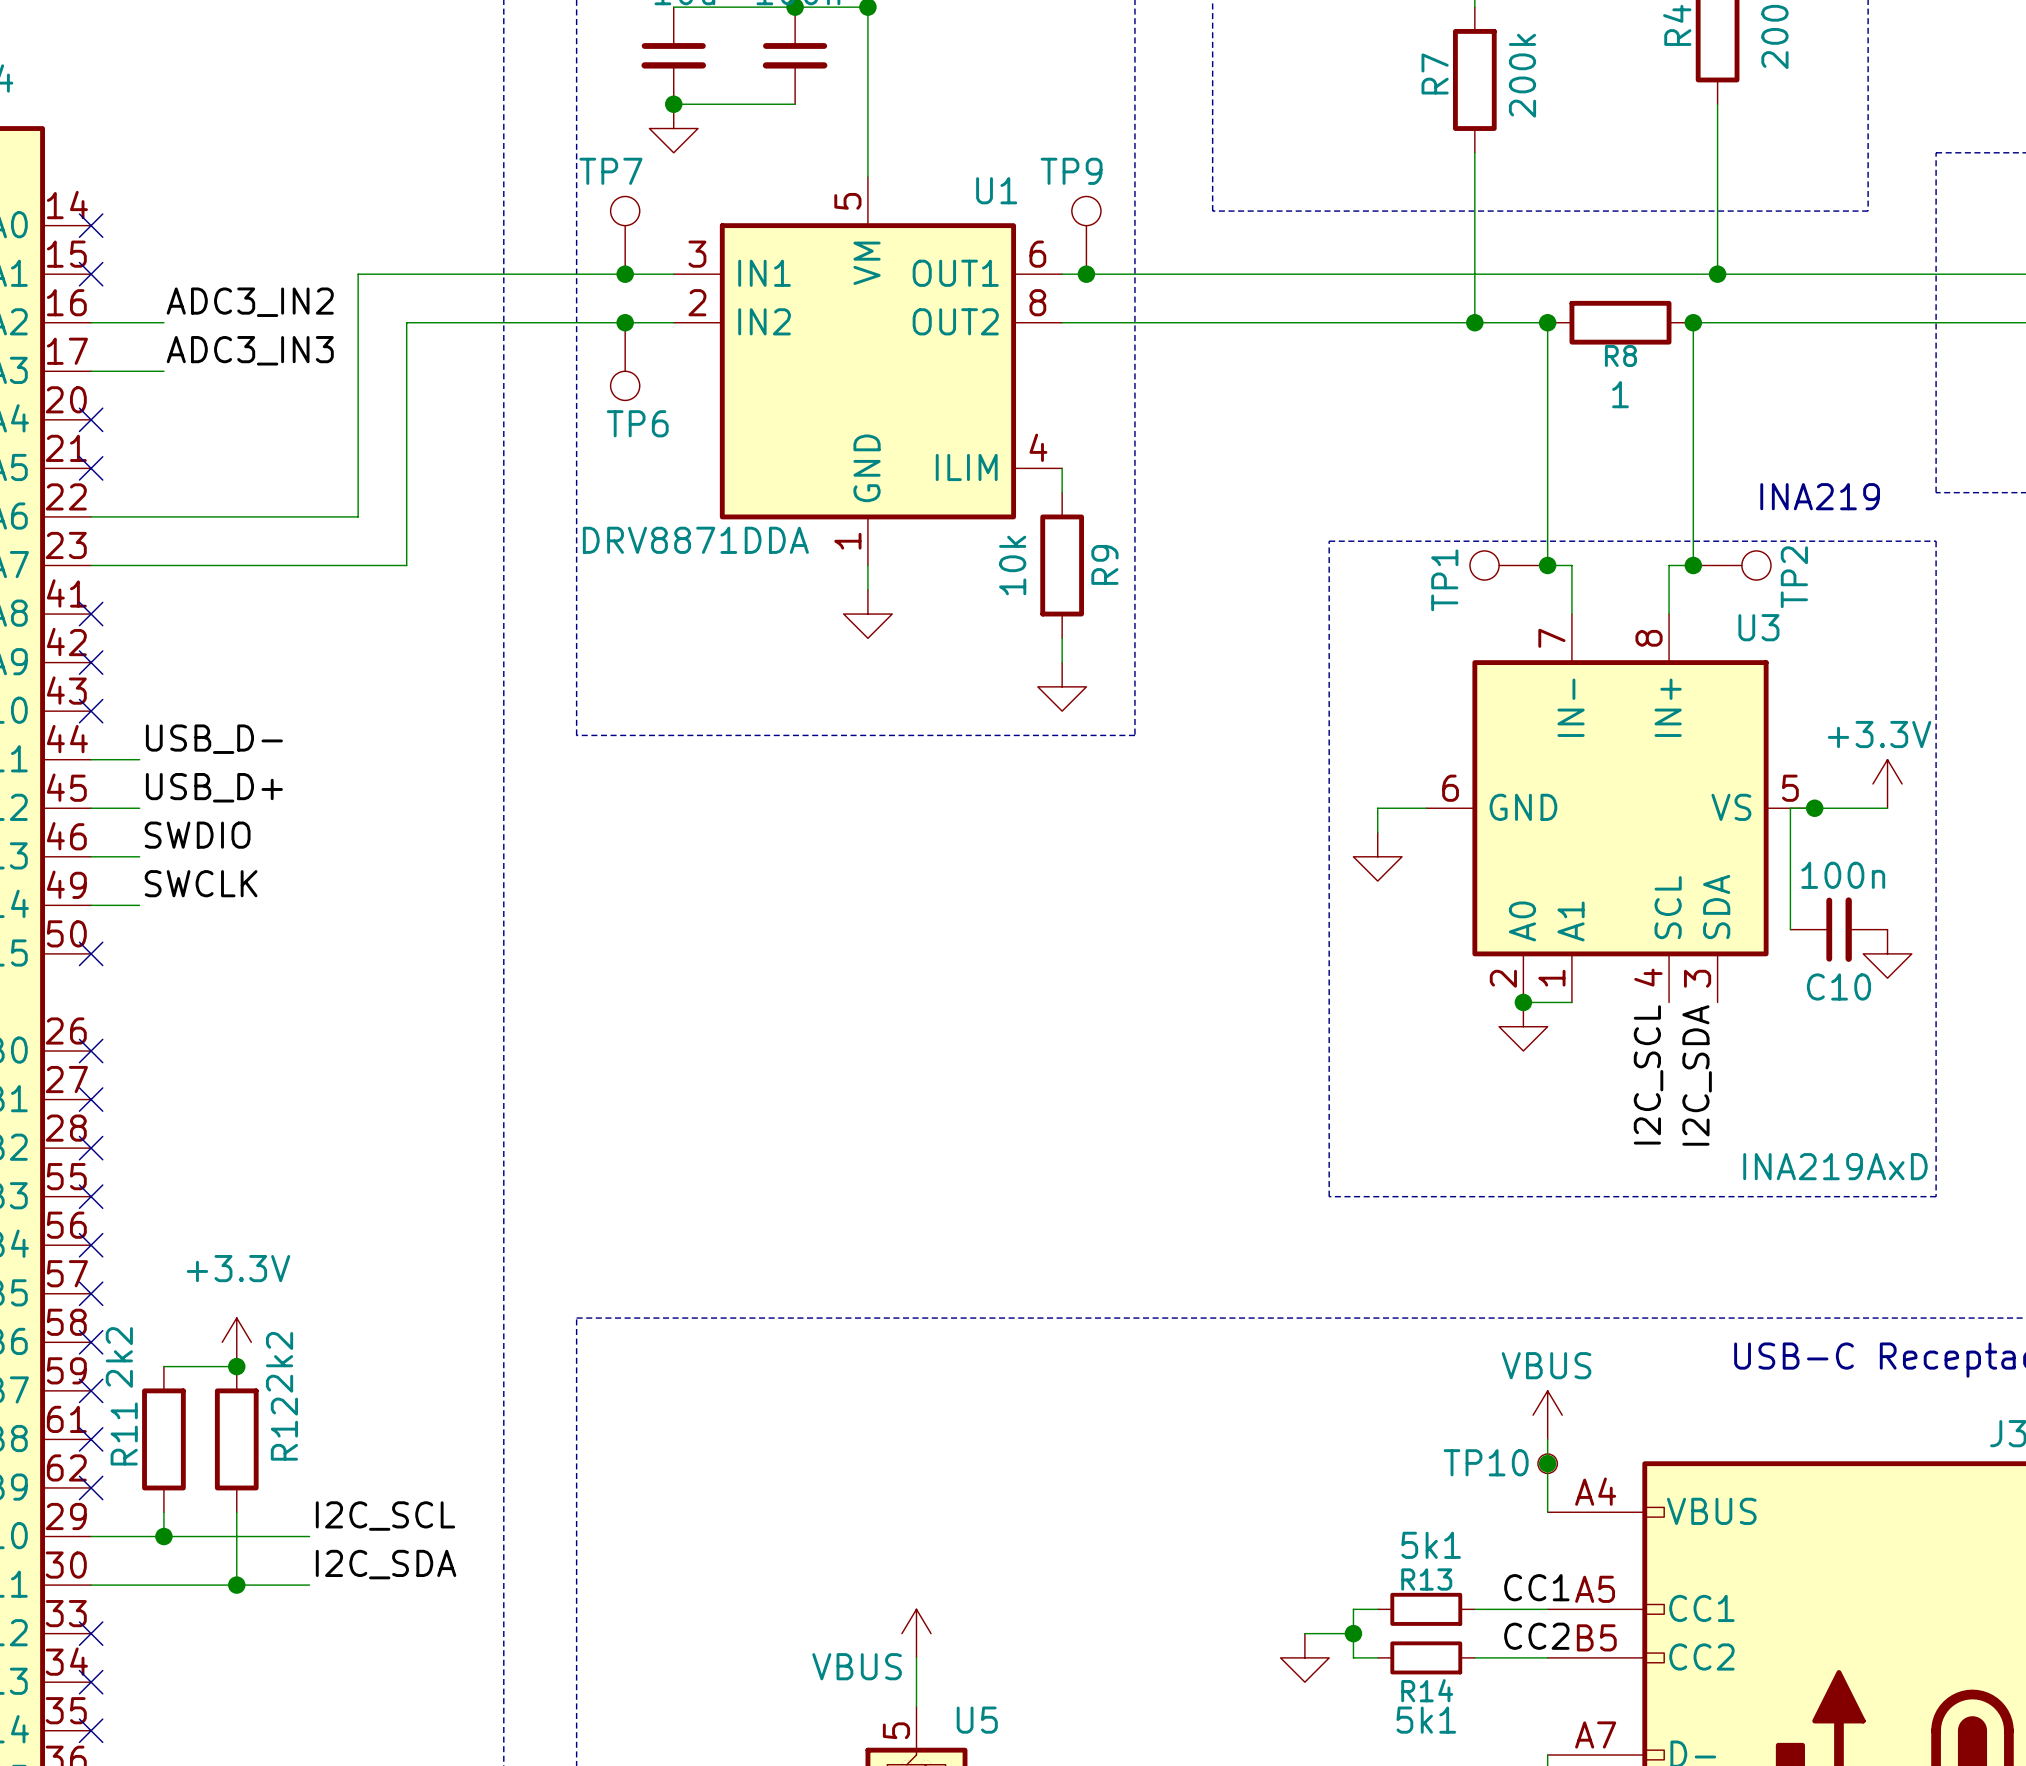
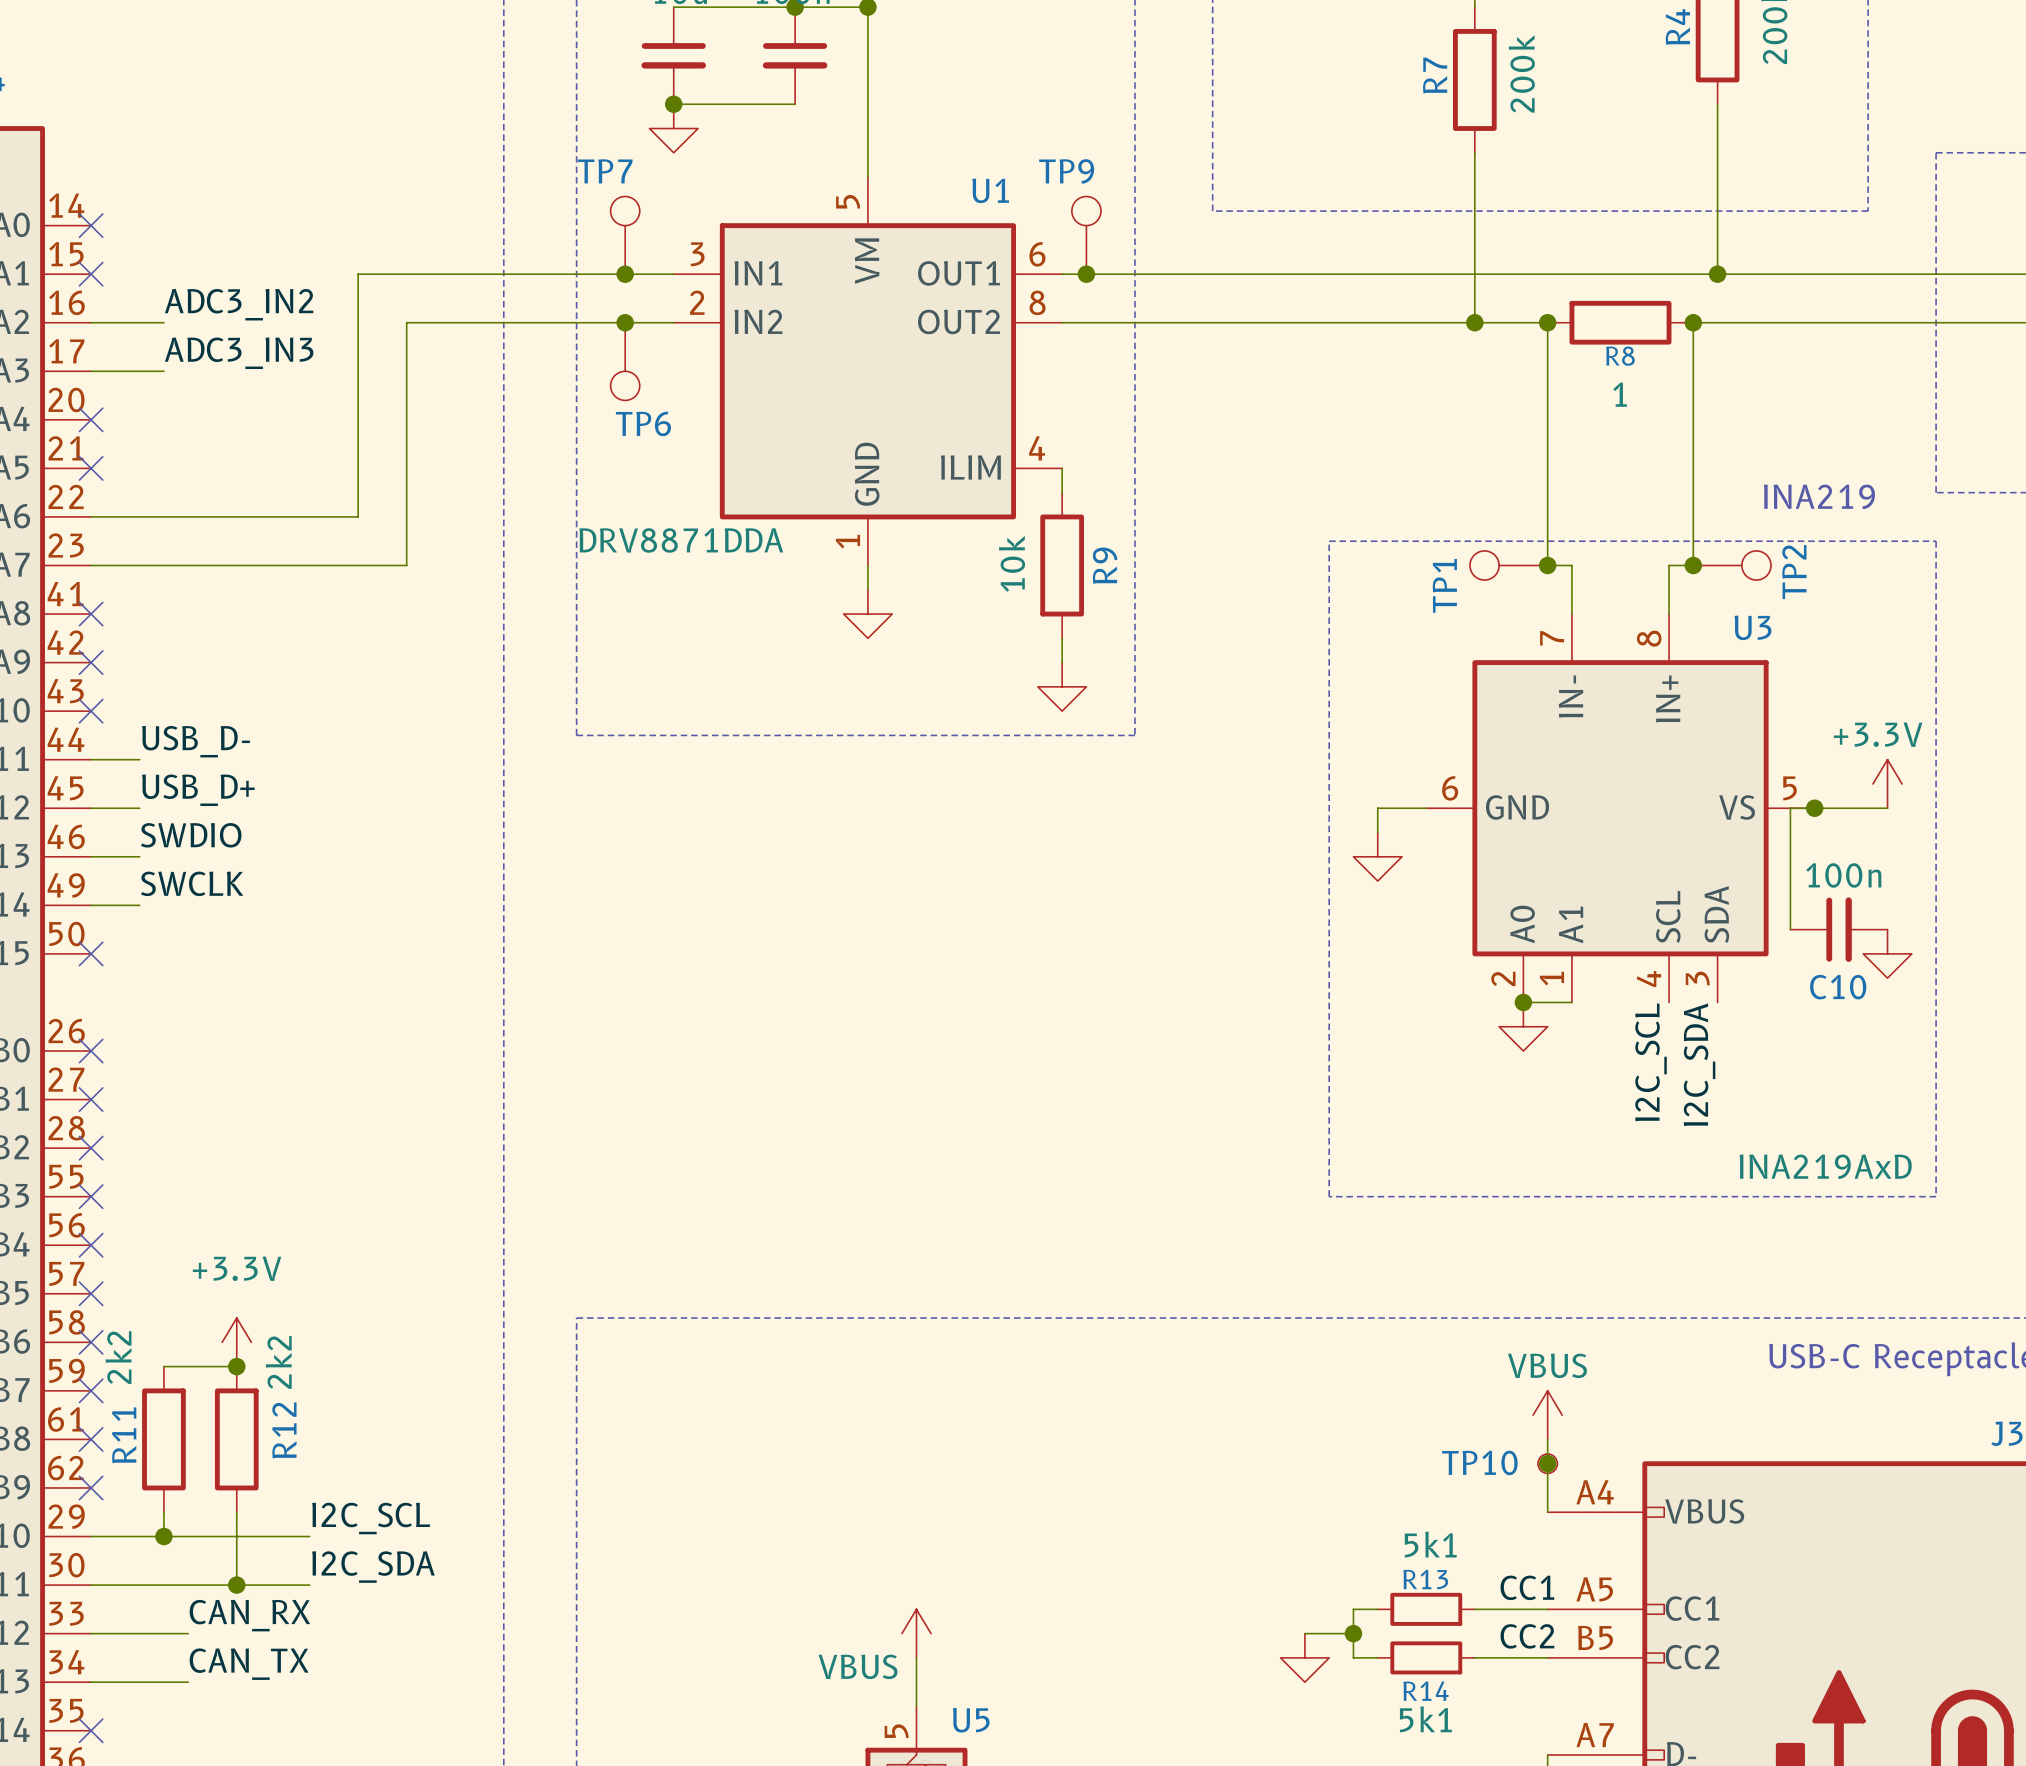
label: none -> CAN_RX (249, 1615)
wire: none -> (91, 1633) (188, 1633)
no-connect mark: (91, 1633) -> none
label: none -> CAN_TX (249, 1664)
wire: none -> (91, 1682) (188, 1682)
no-connect mark: (91, 1682) -> none

